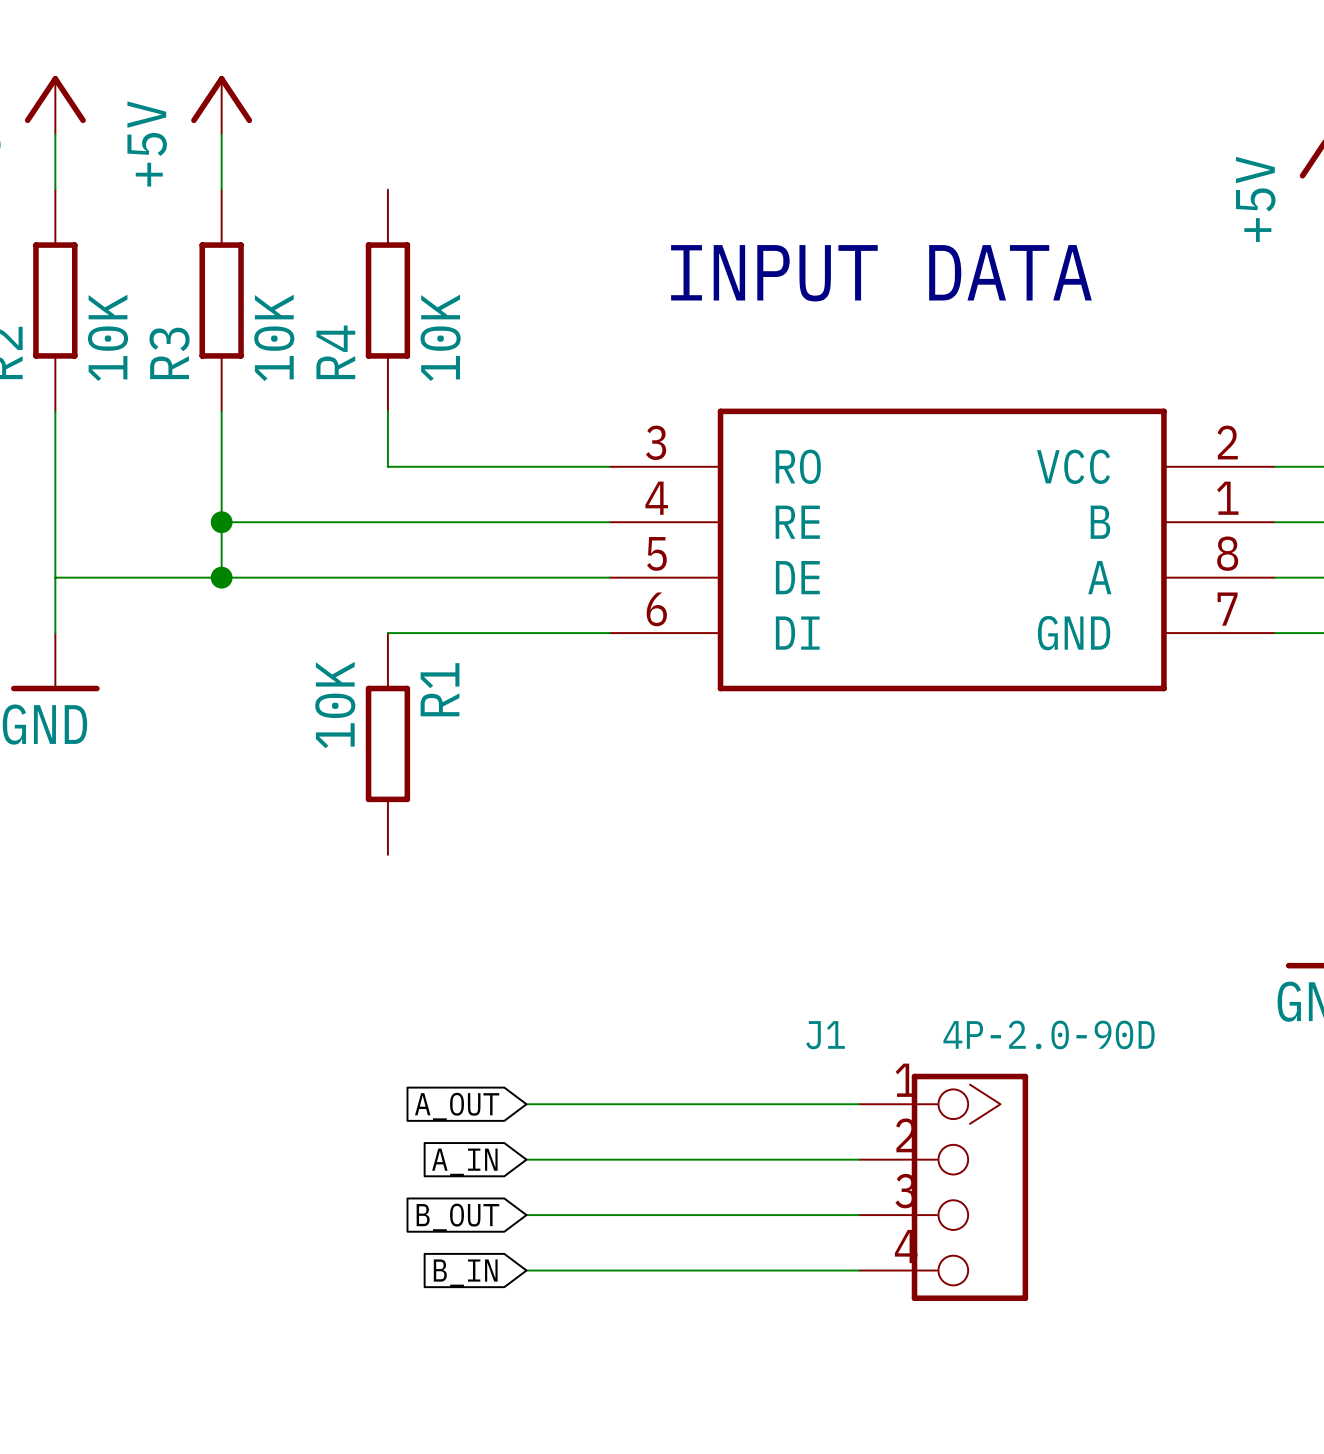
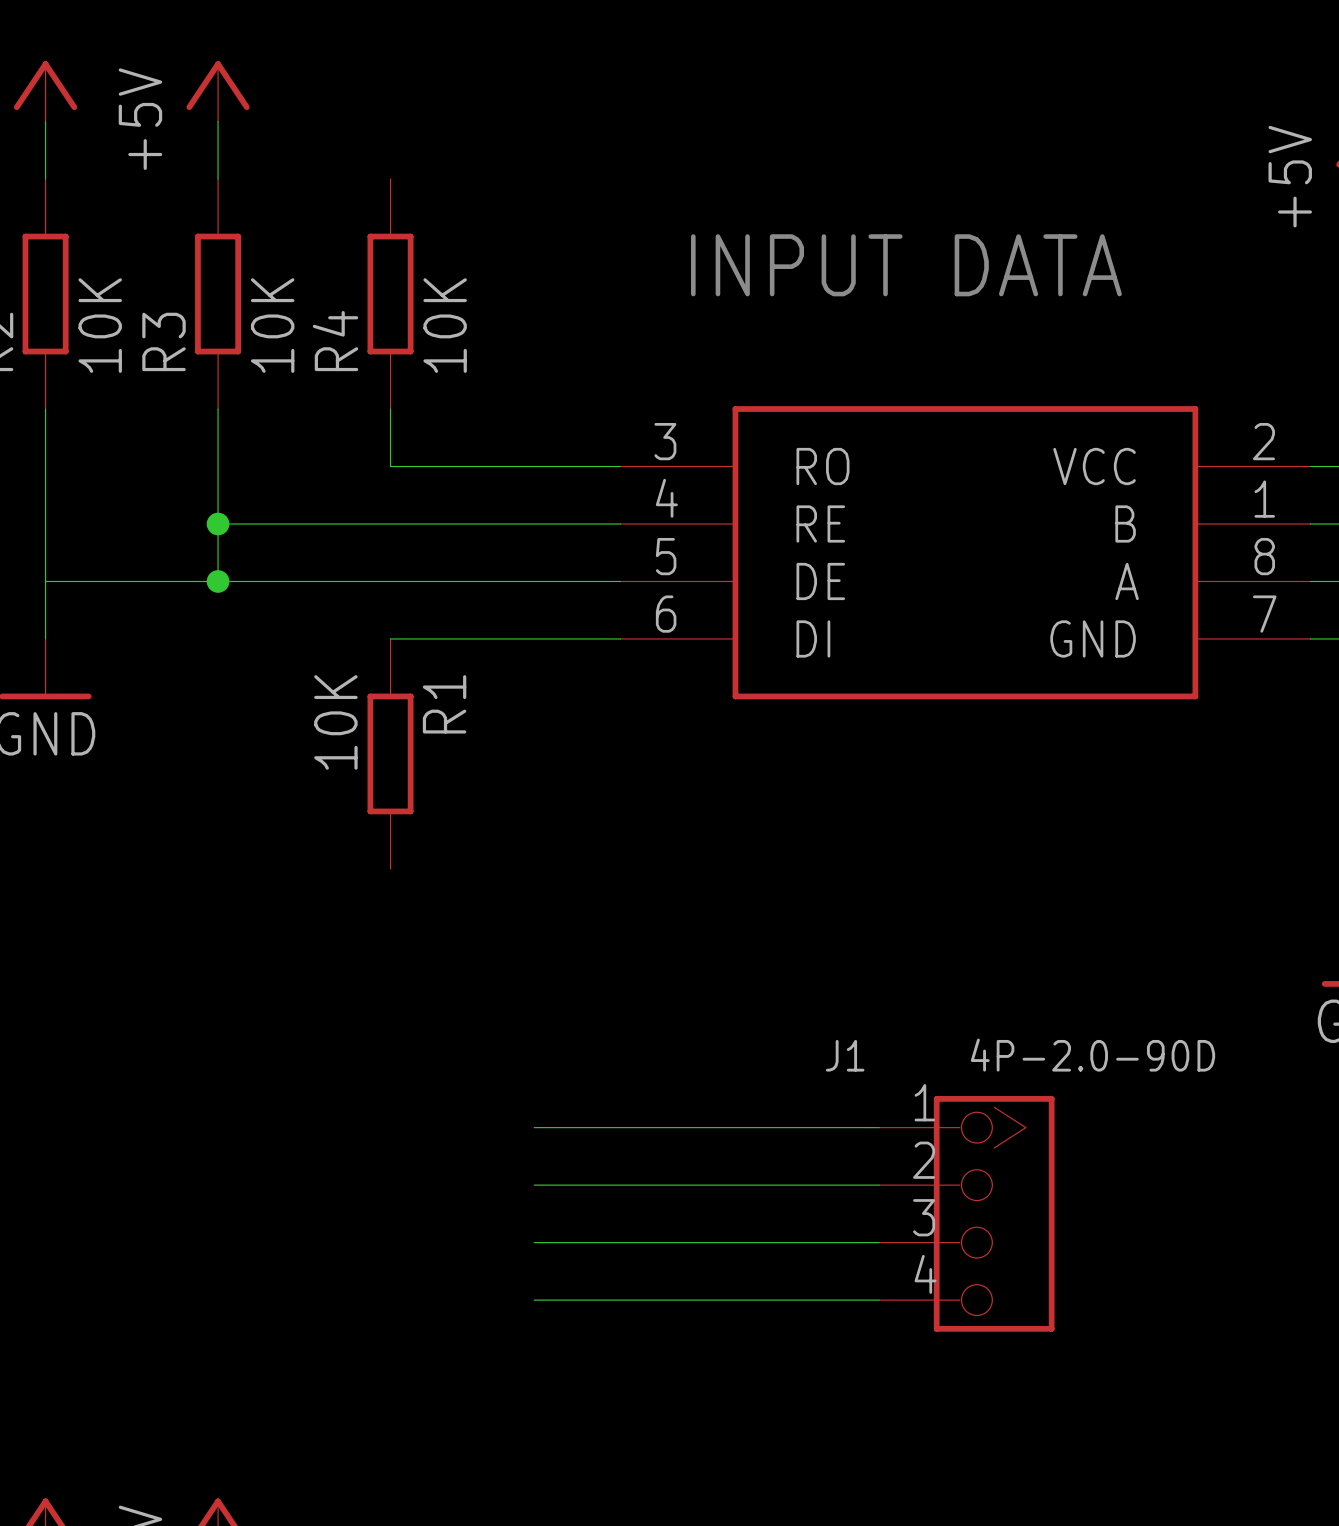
global label: A_OUT (457, 1106) -> none
global label: A_IN (464, 1162) -> none
global label: B_OUT (457, 1217) -> none
global label: B_IN (465, 1273) -> none

